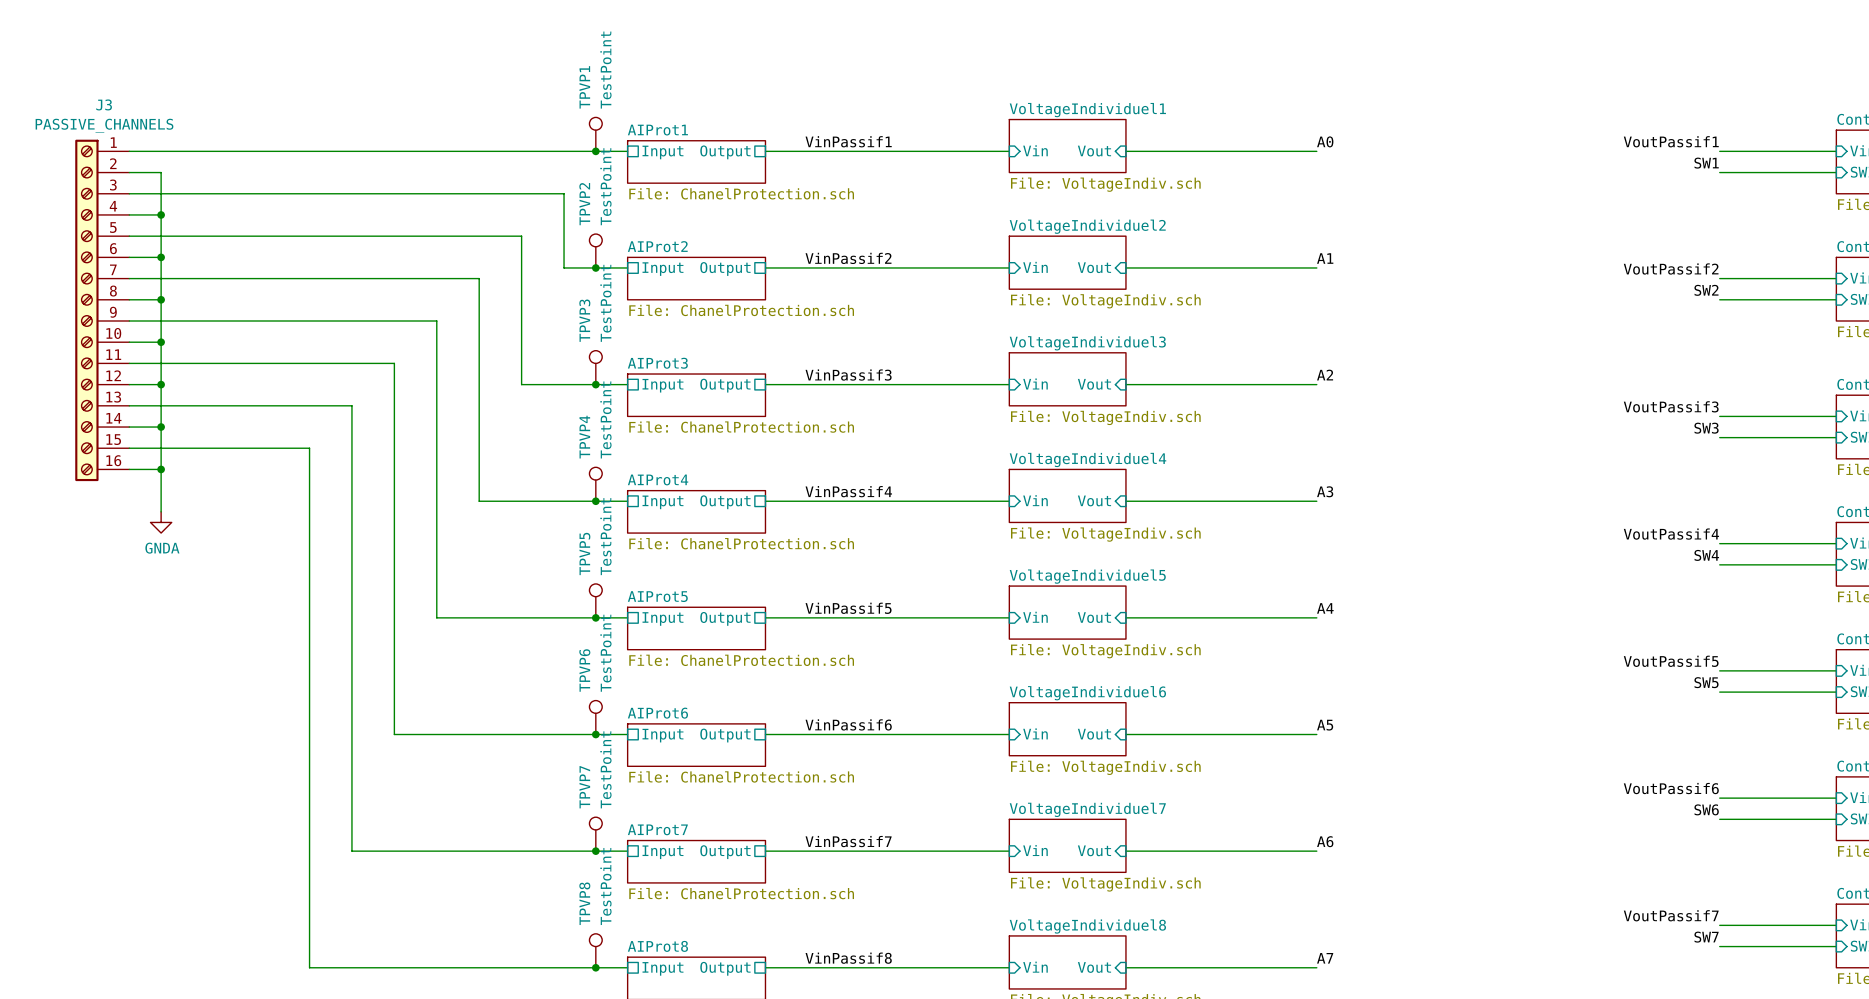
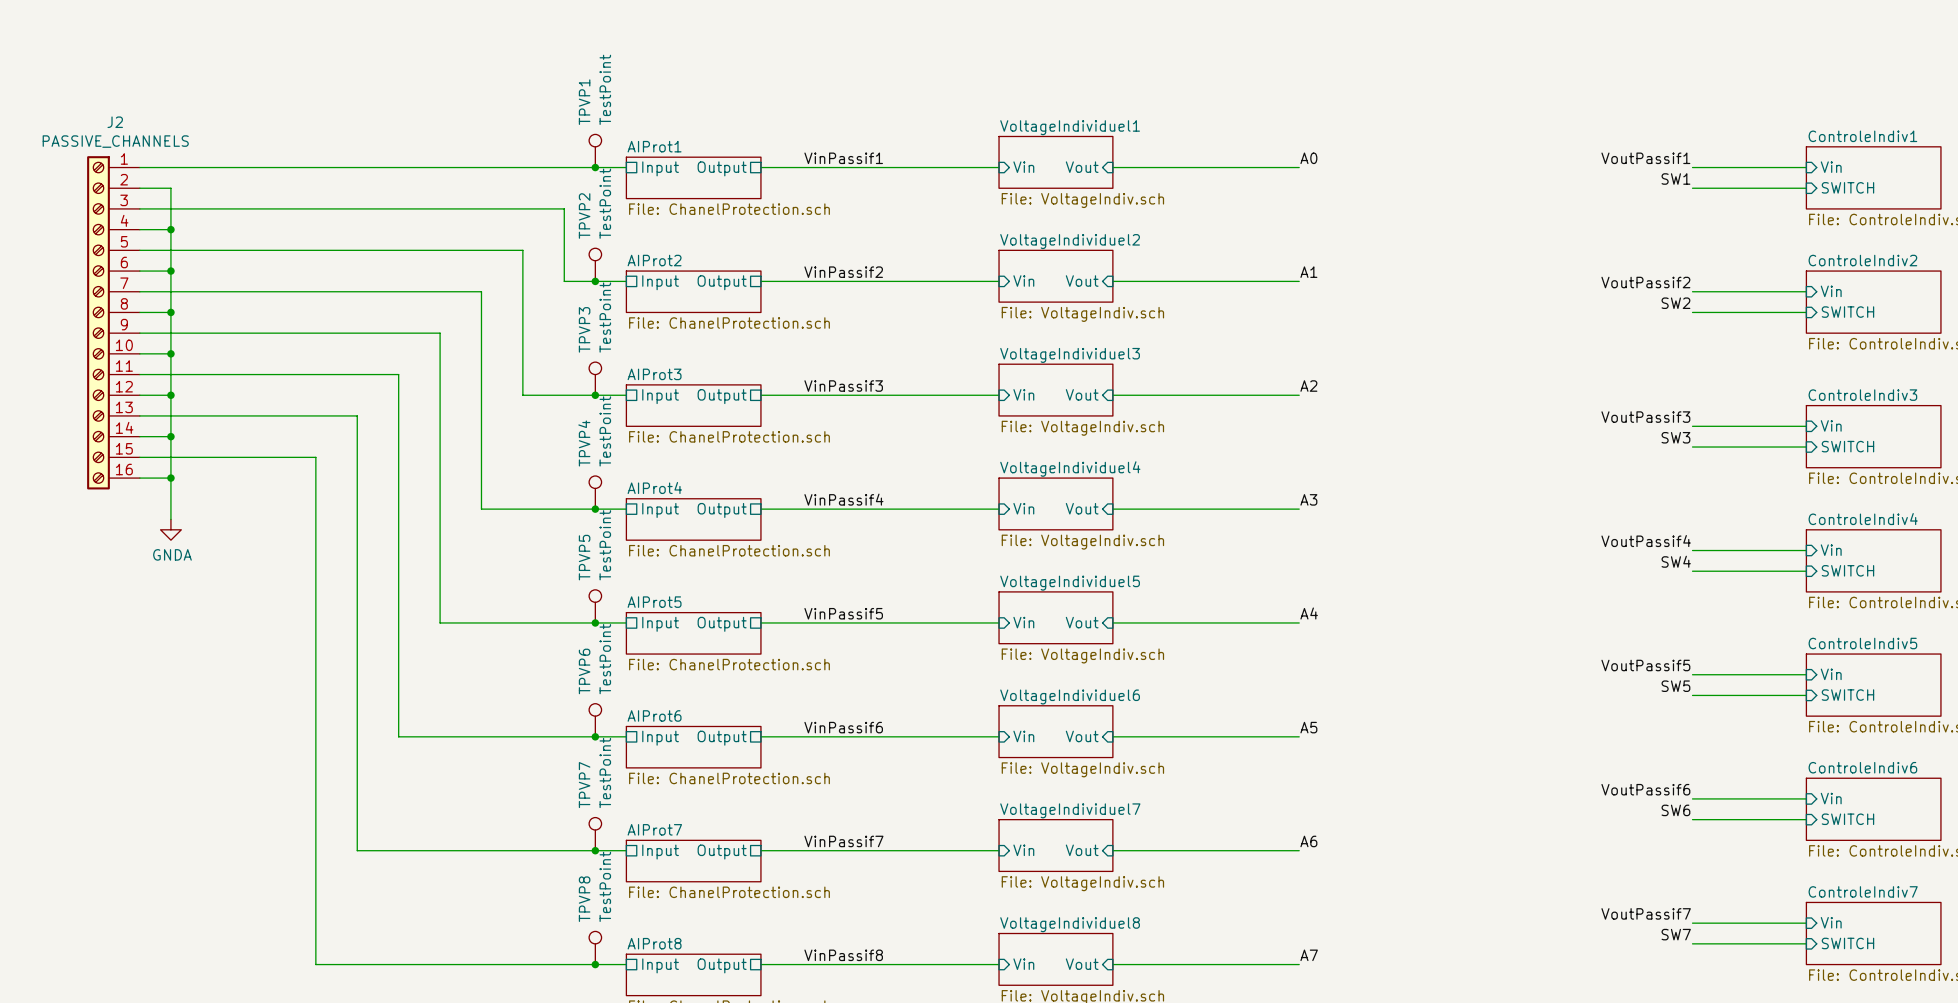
J3 name: J3 (104, 104) -> J2 (115, 122)

